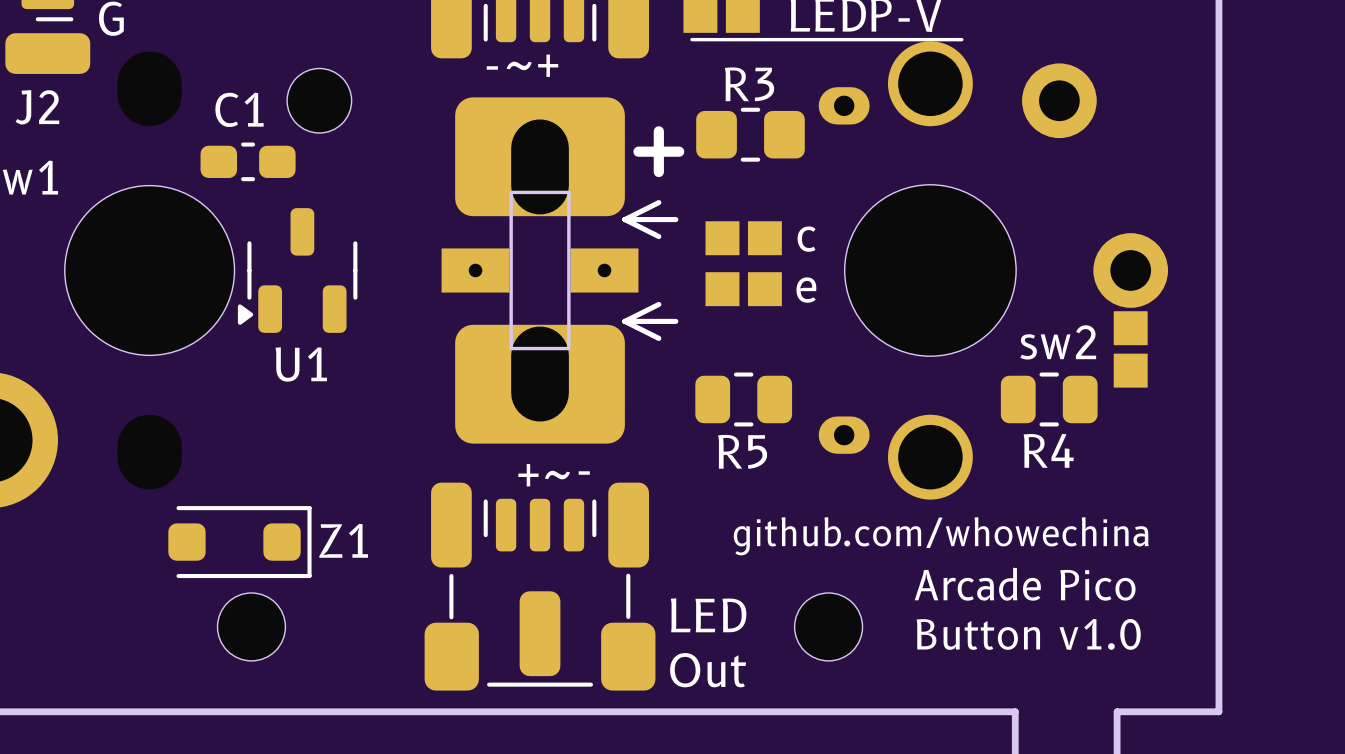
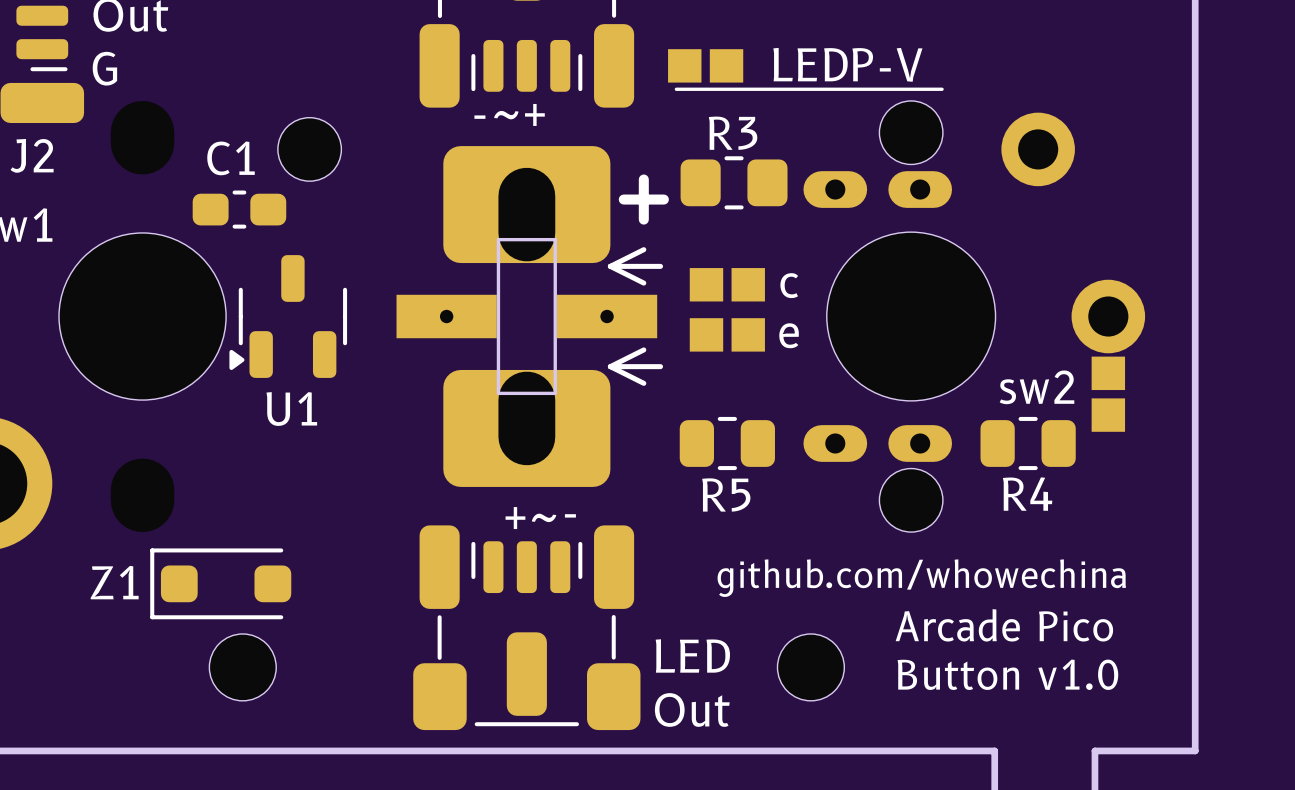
part footprint: [818, 41, 1169, 500] -> [826, 100, 1146, 533]
part footprint: [441, 97, 685, 444] -> [396, 146, 669, 487]
part: none -> (877, 189)
part: none -> (877, 443)
Z1 rotation: 0° (239, 542) -> 180° (220, 583)

